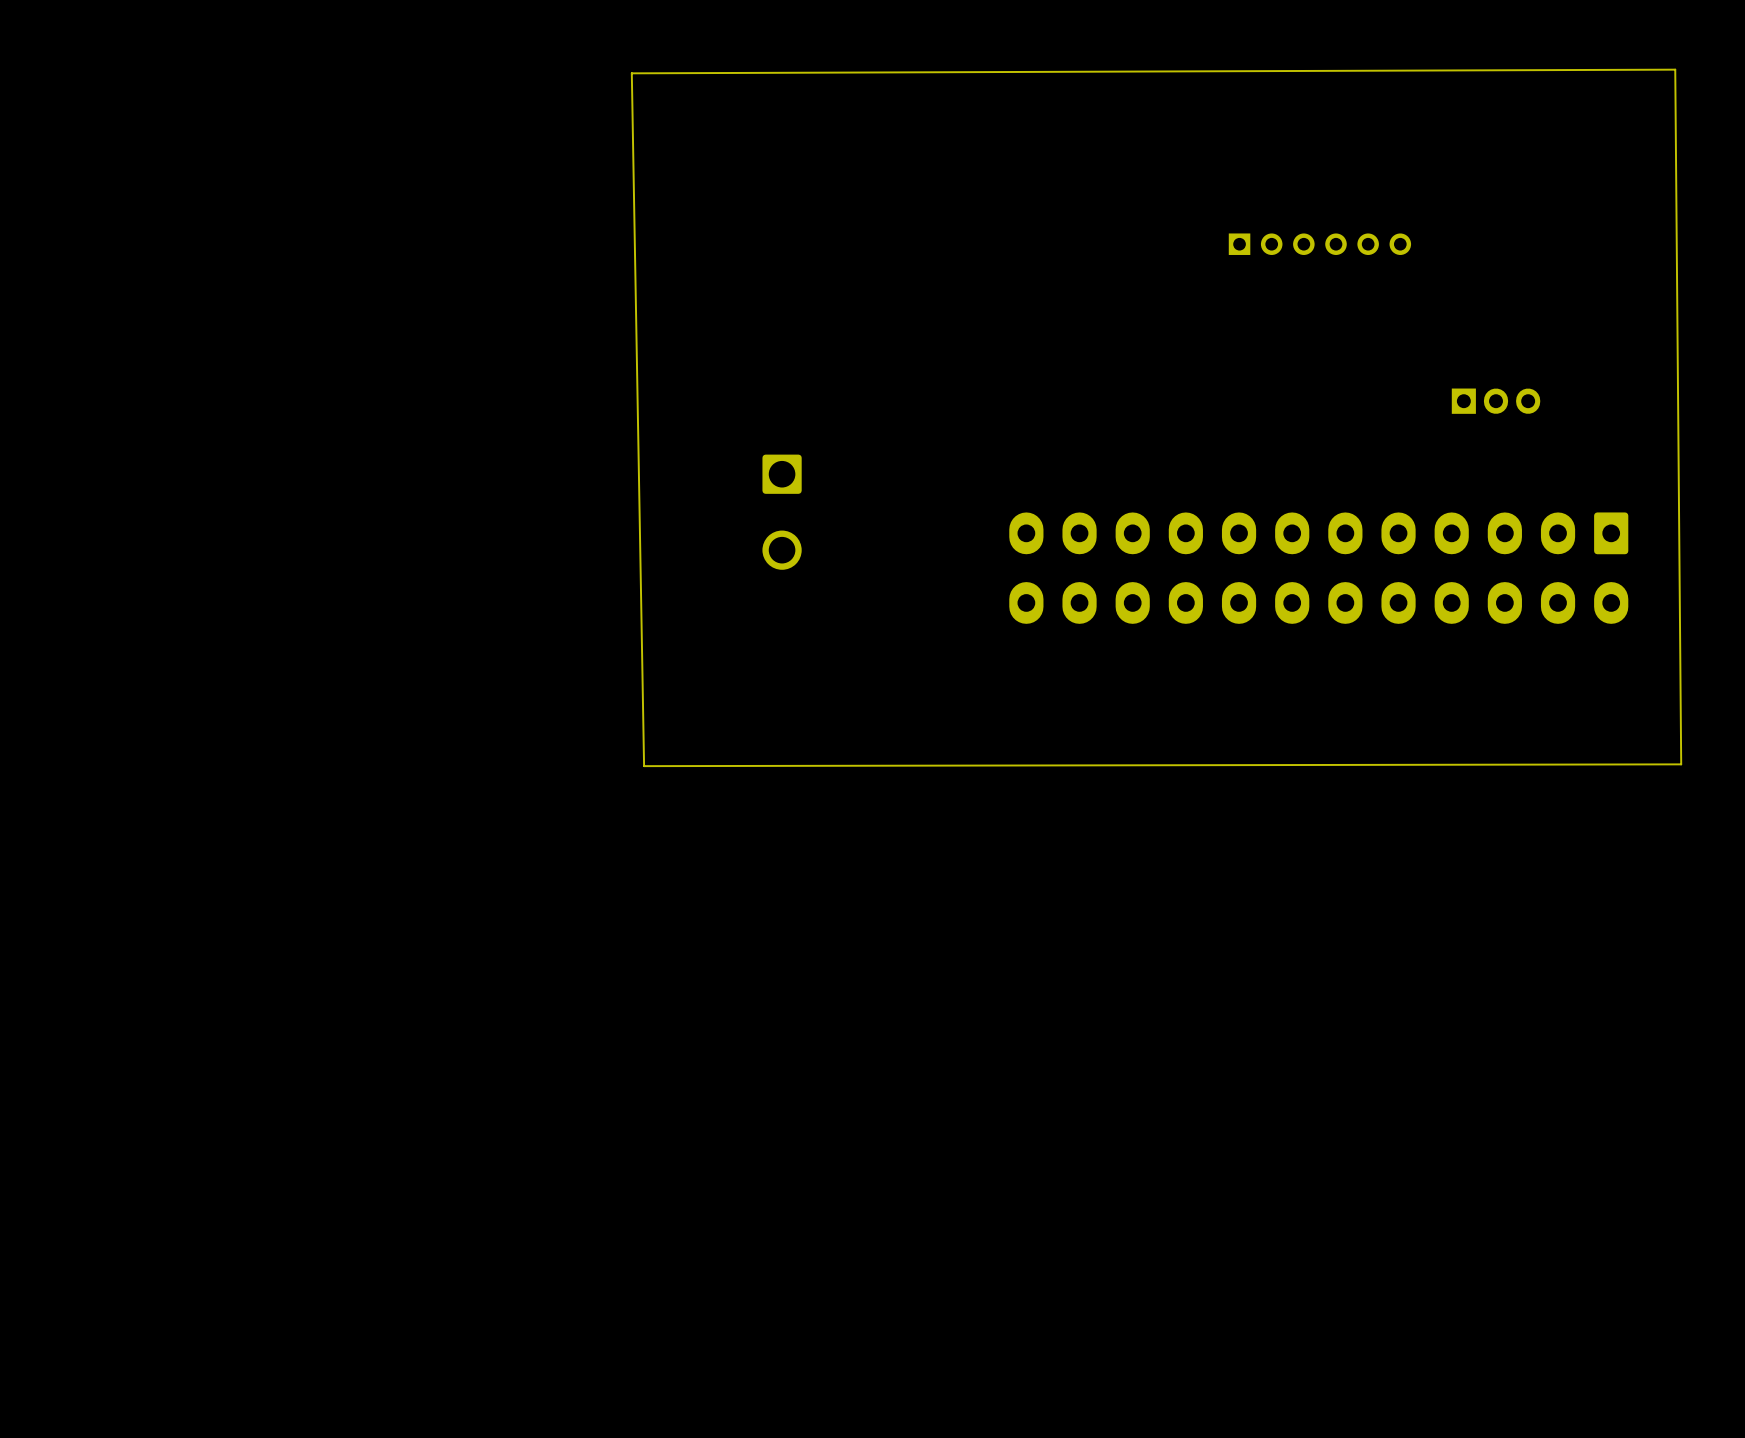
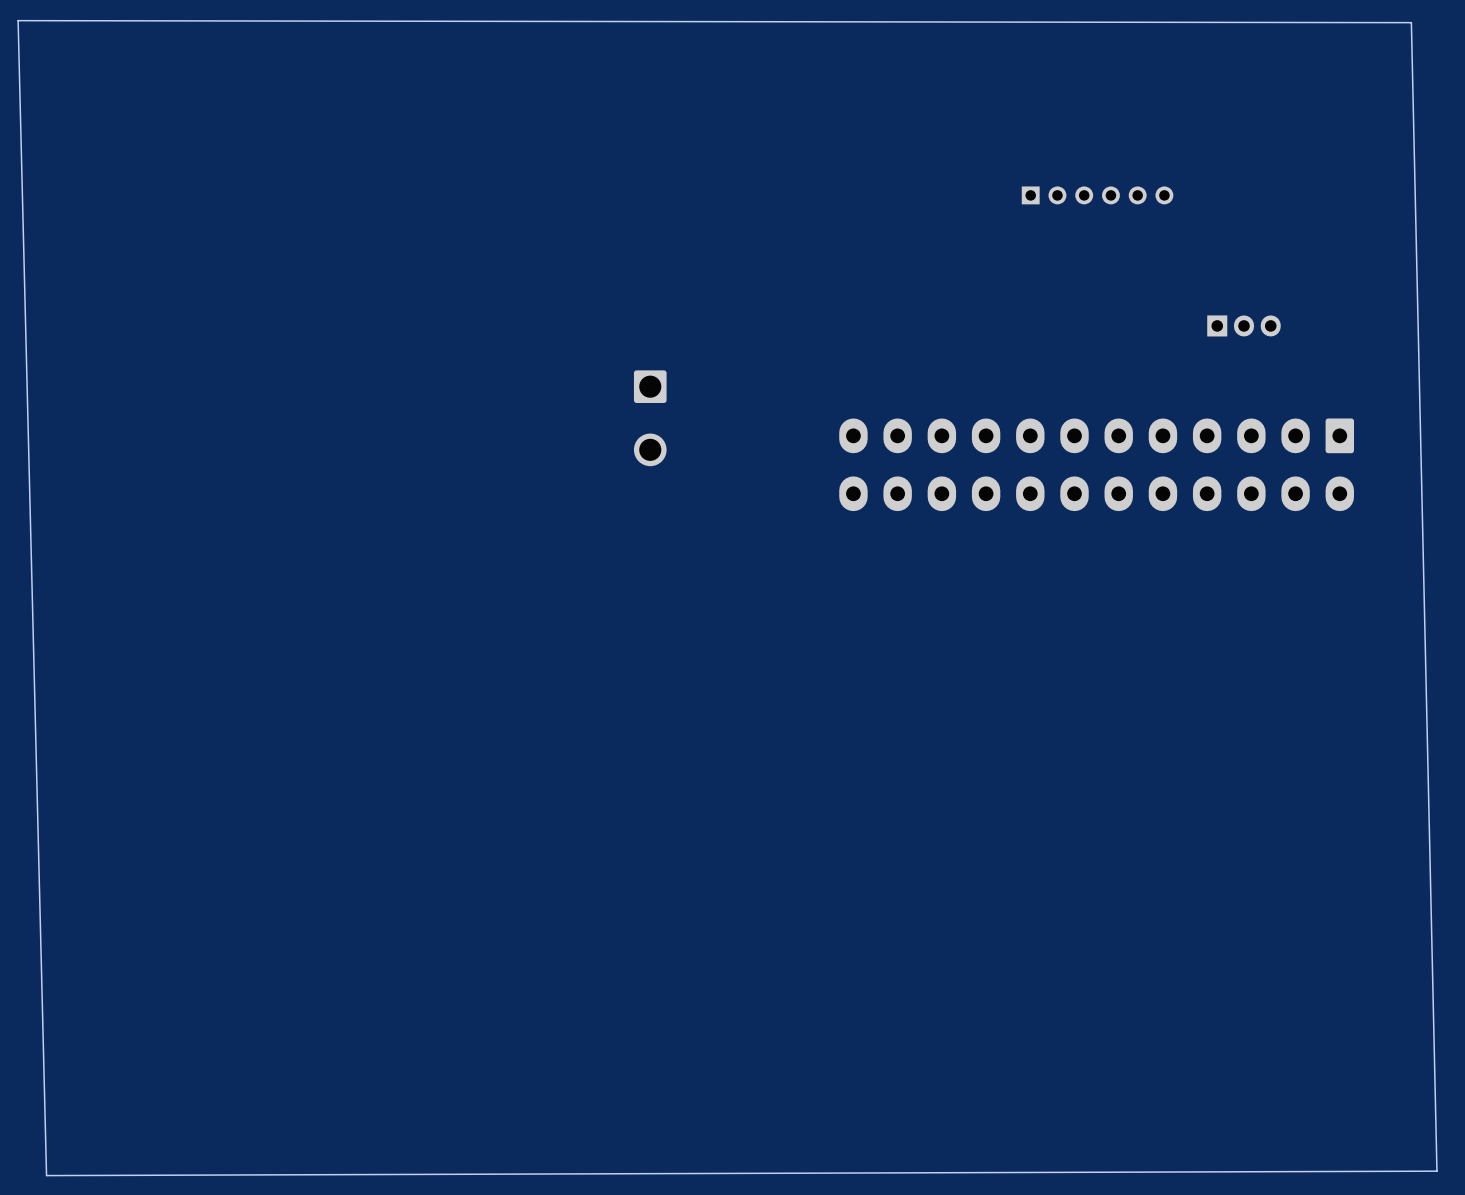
board edge: none -> (18, 20) (46, 1175) (1436, 1171) (1411, 22) (18, 20)
board edge: (1675, 69) (631, 73) (644, 766) (1681, 764) (1675, 69) -> none

